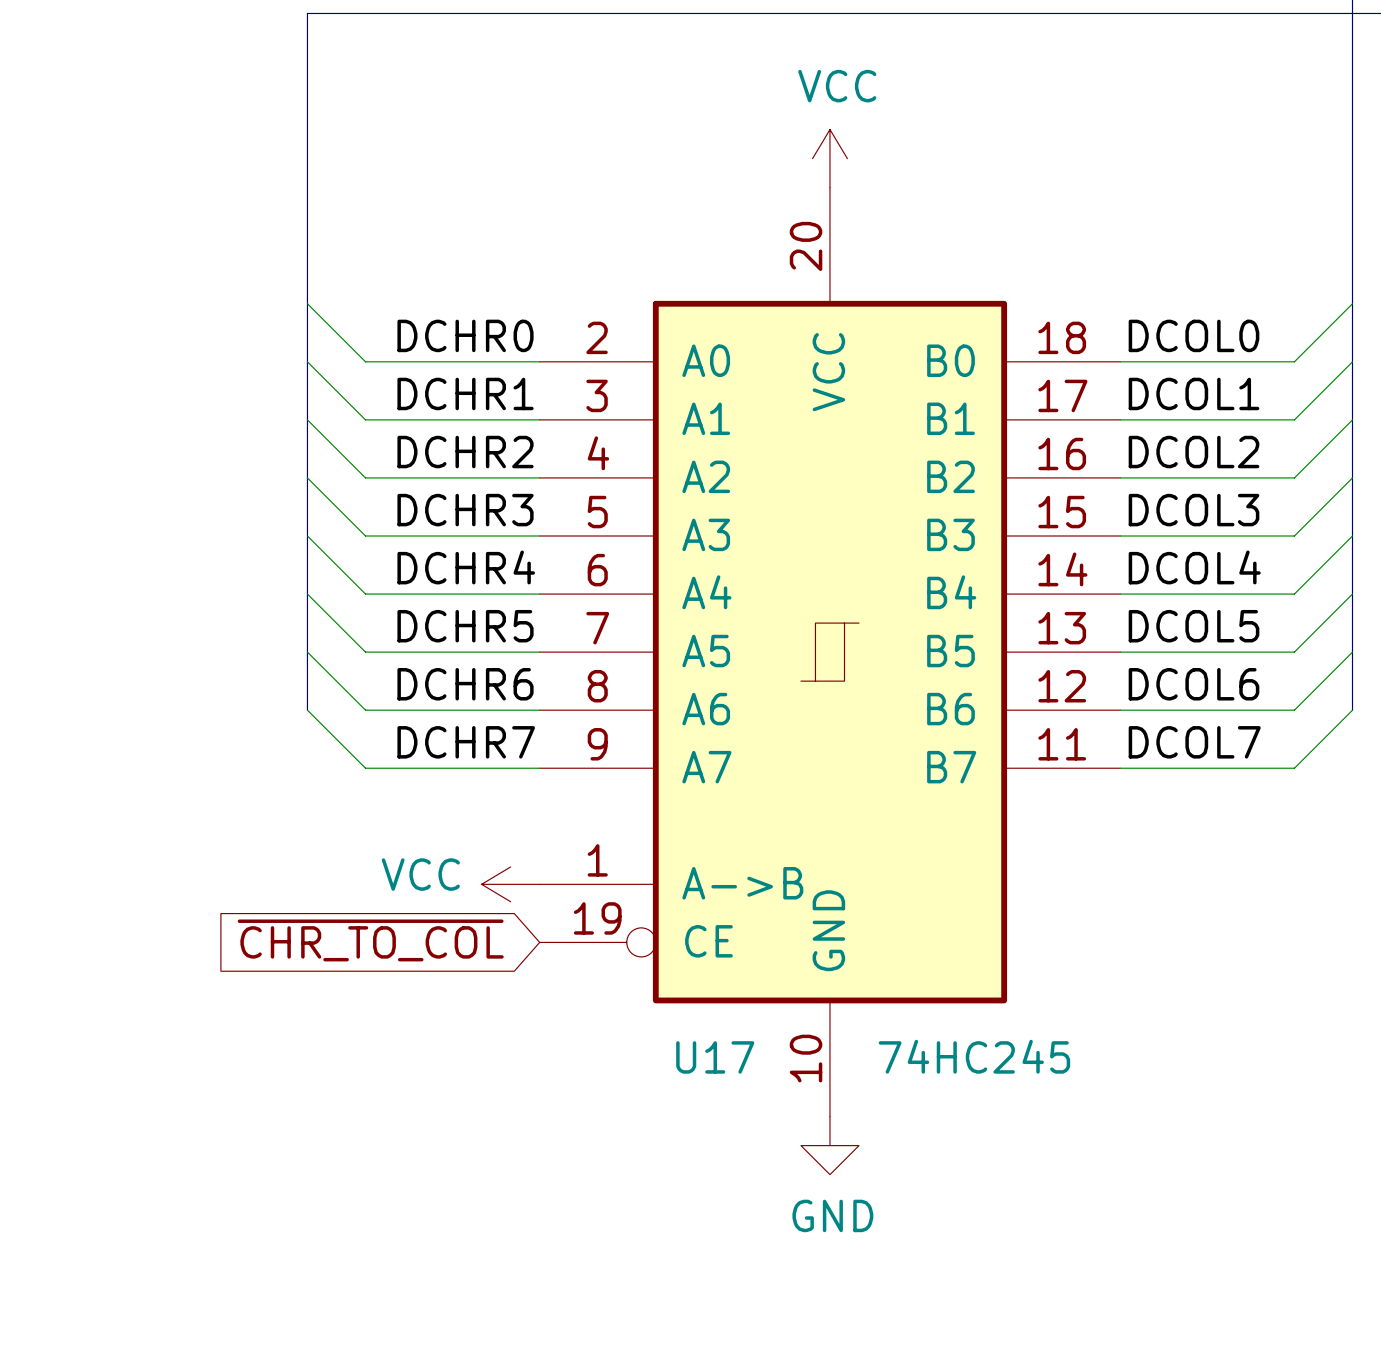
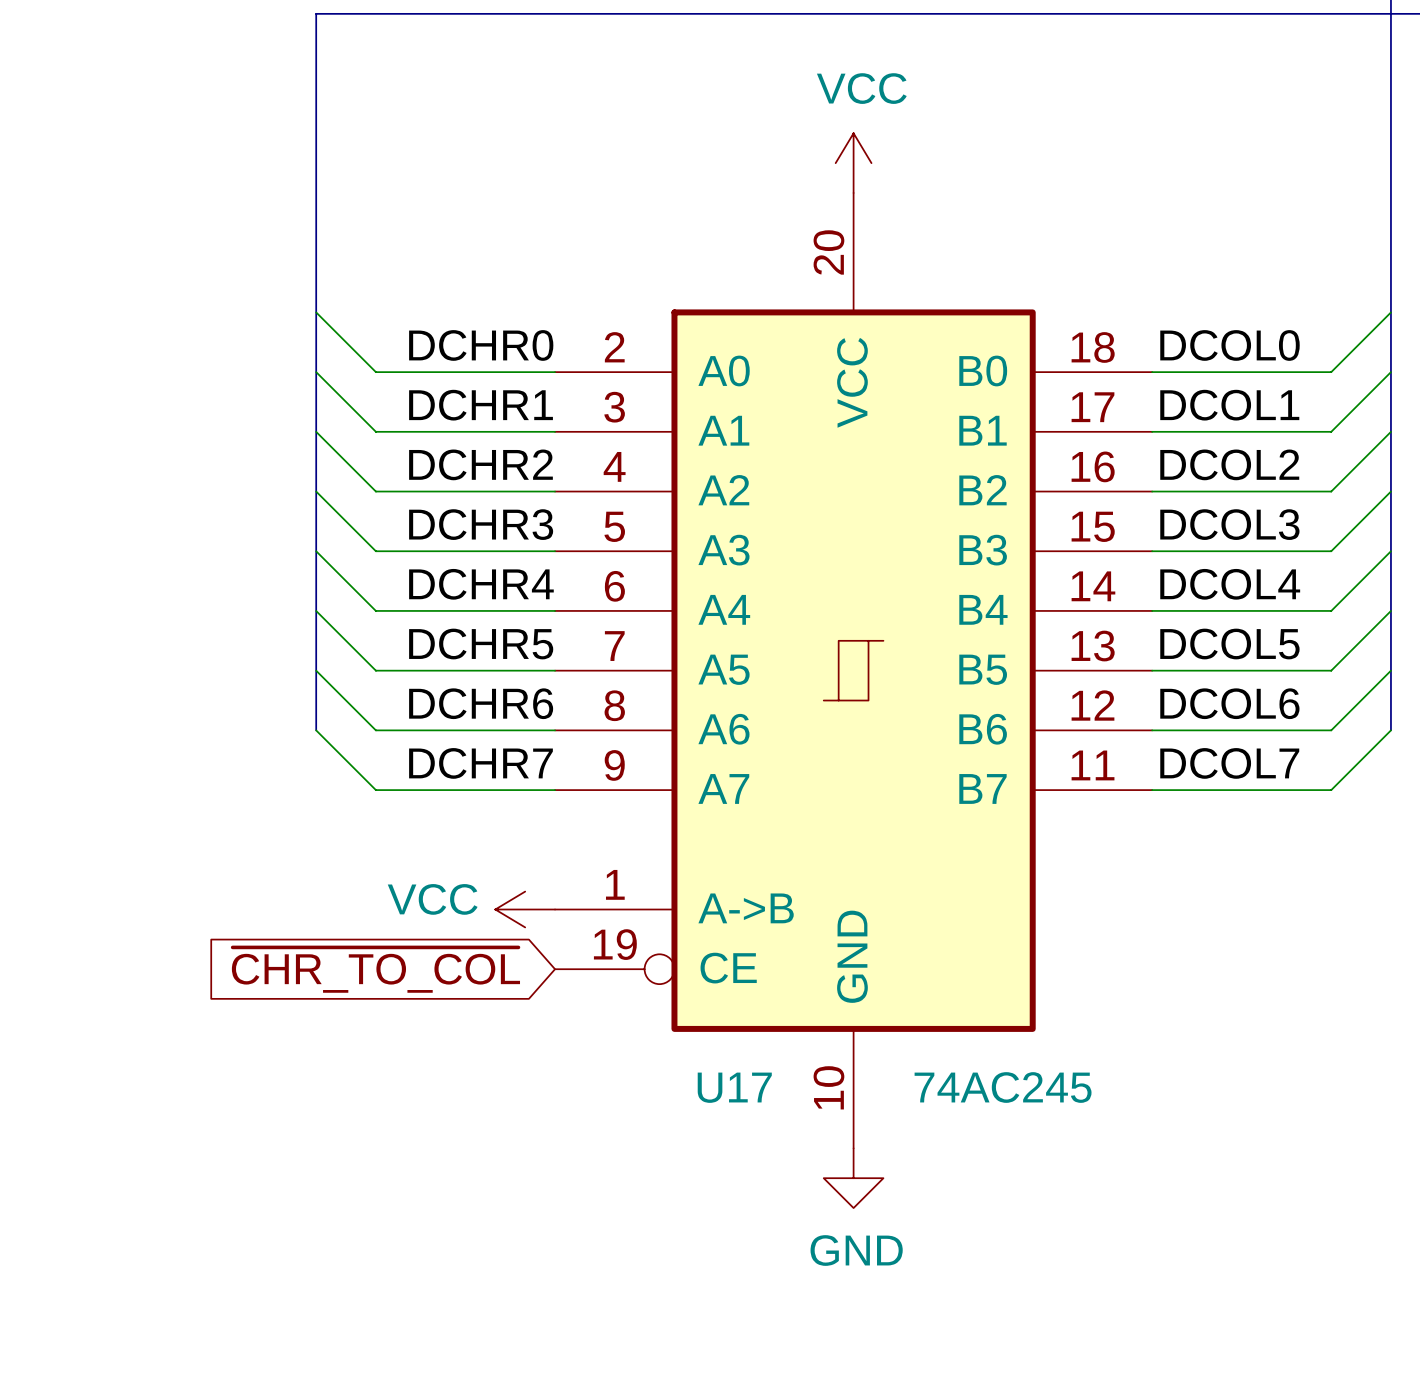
U17 value: 74HC245 (974, 1056) -> 74AC245 (1003, 1087)

